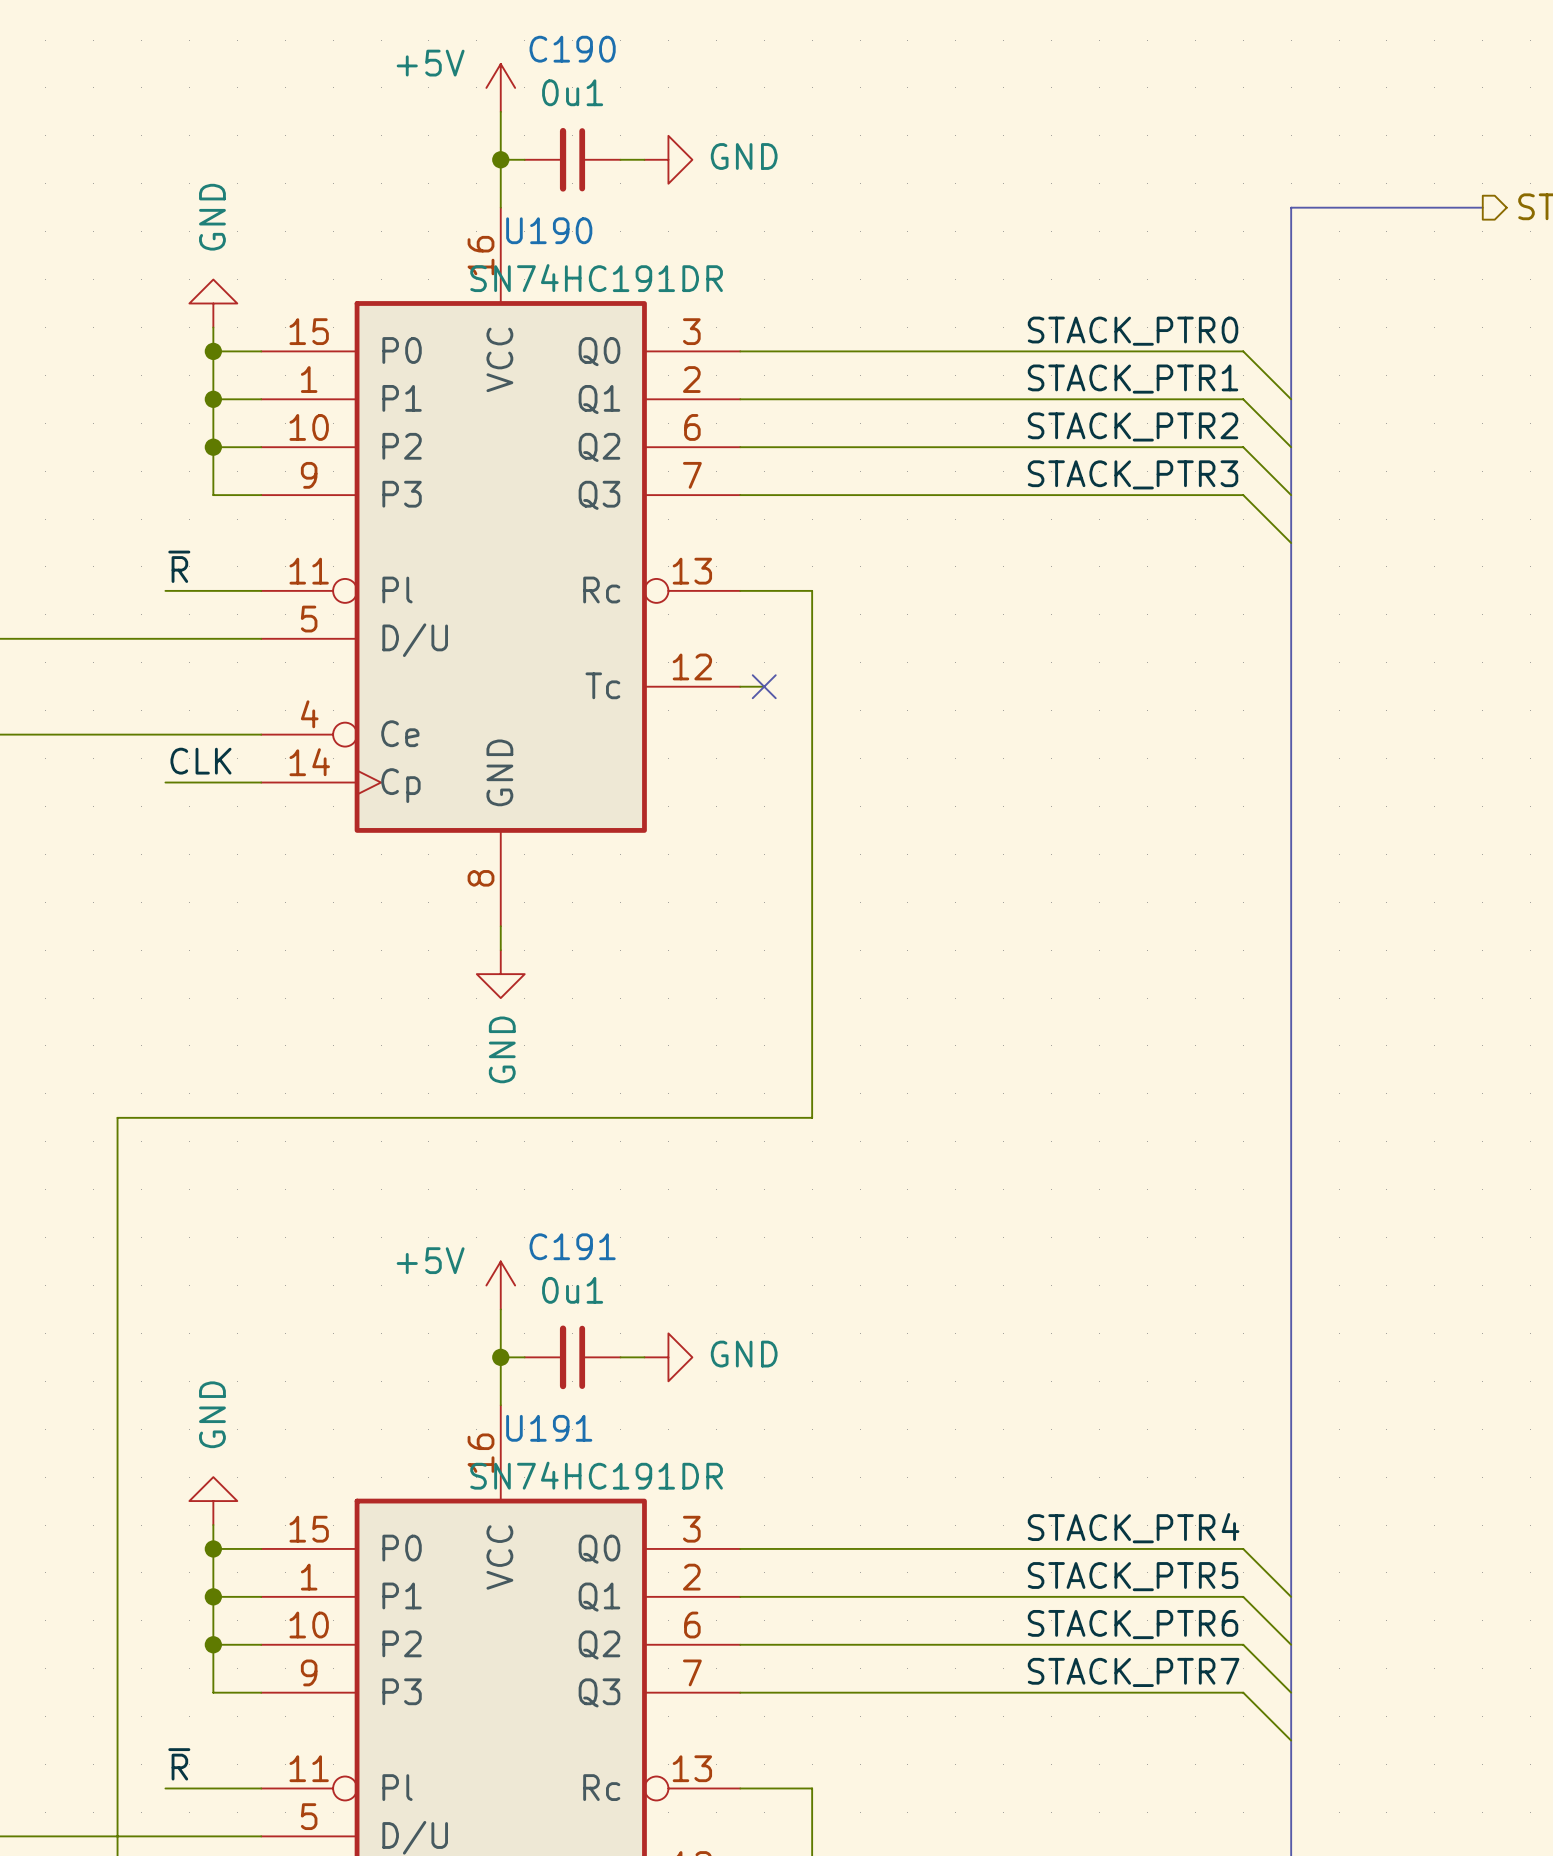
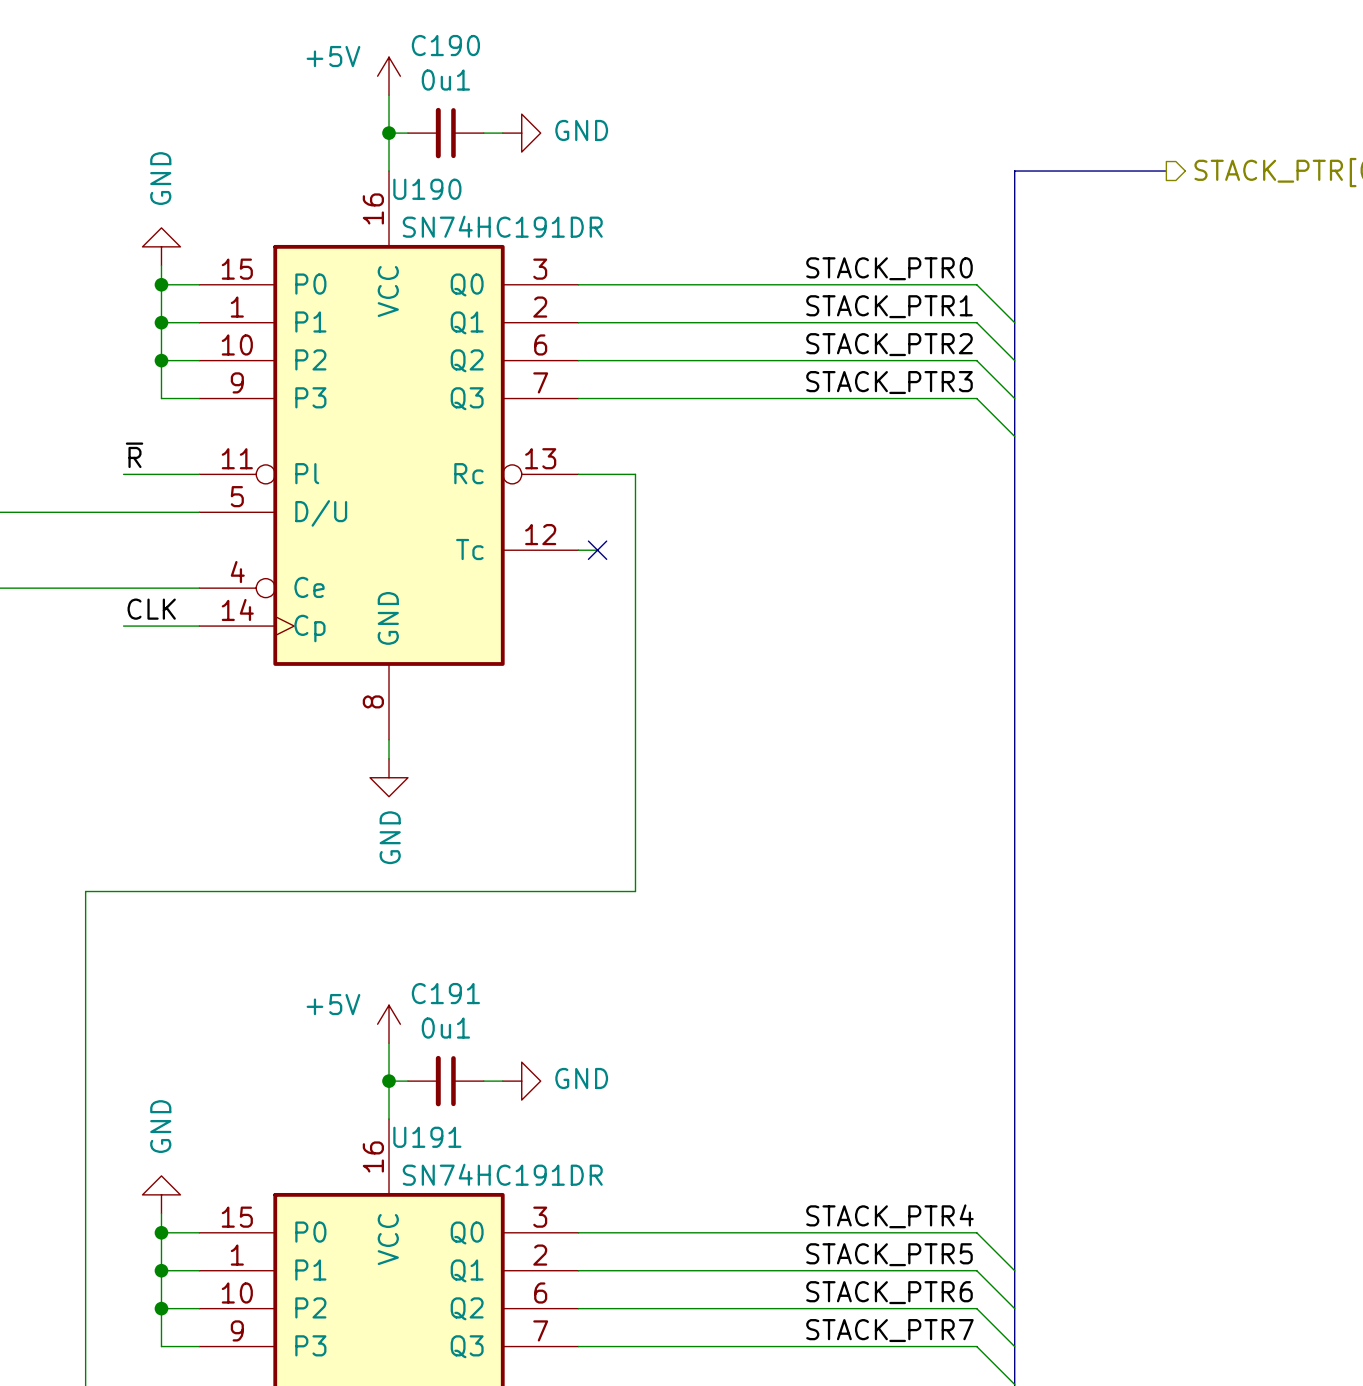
U190 value position: SN74HC191DR (596, 278) -> SN74HC191DR (502, 226)
U191 value position: SN74HC191DR (596, 1475) -> SN74HC191DR (502, 1174)

